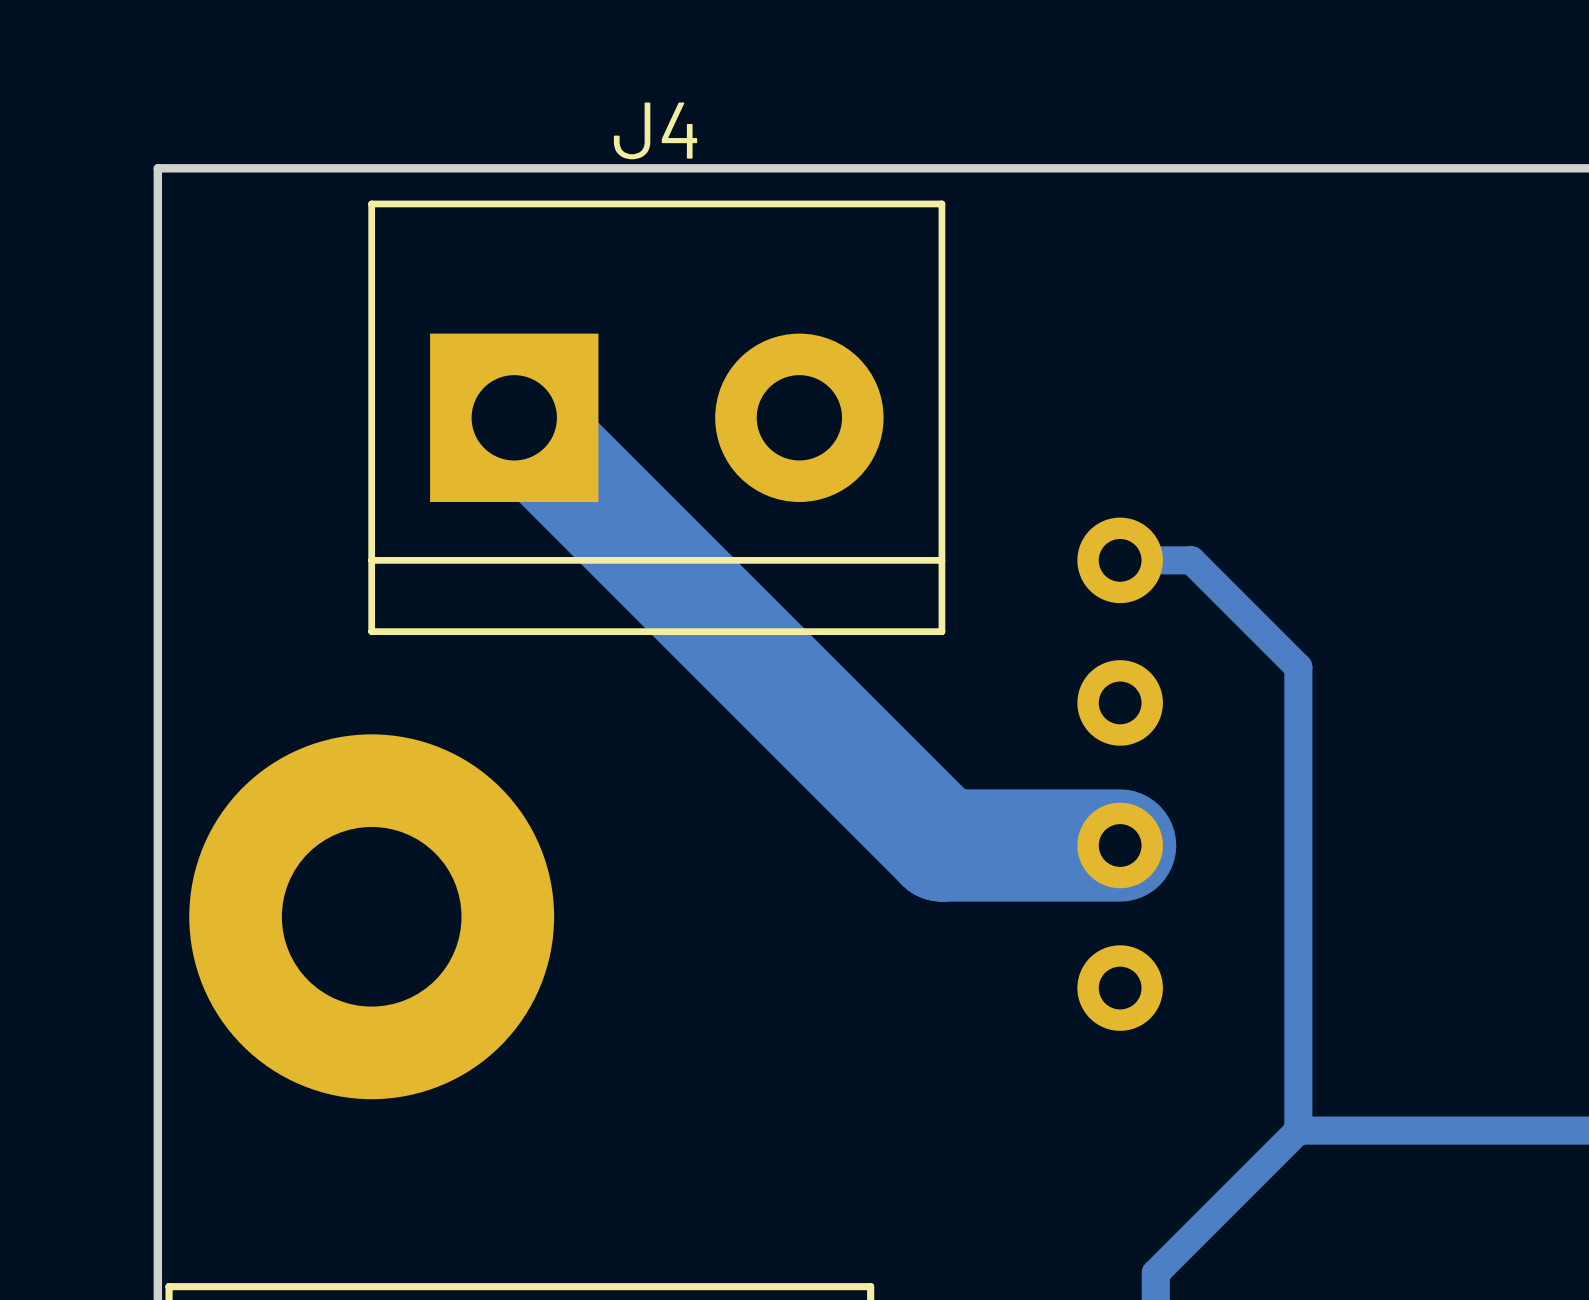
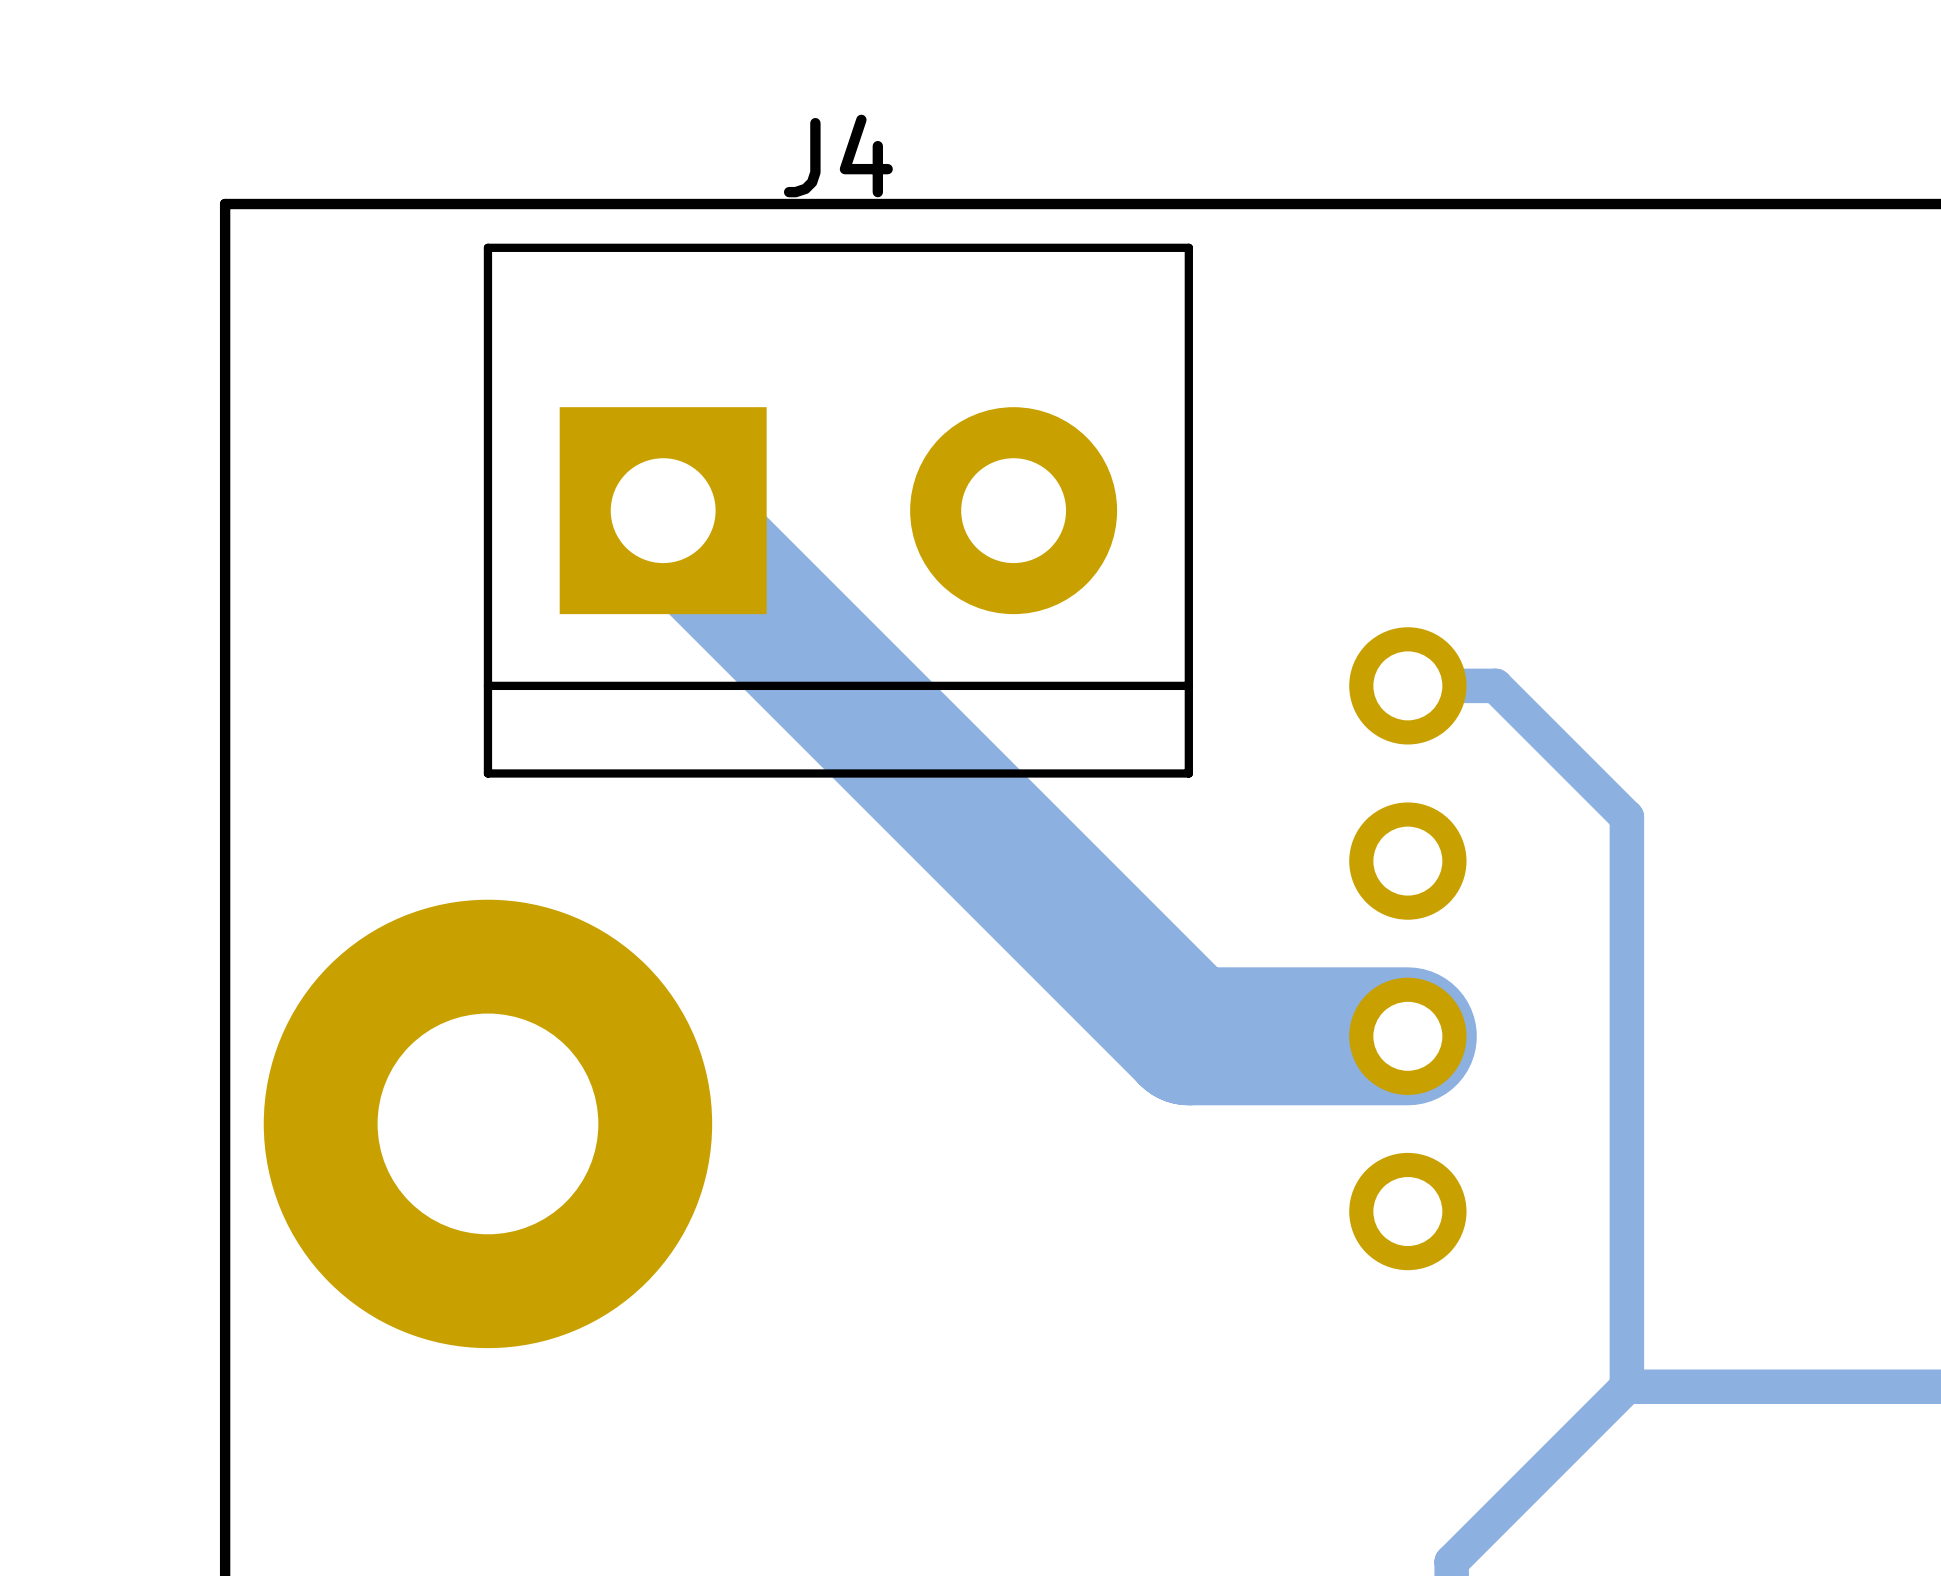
part footprint: [1077, 517, 1163, 1031] -> [1349, 627, 1467, 1271]

